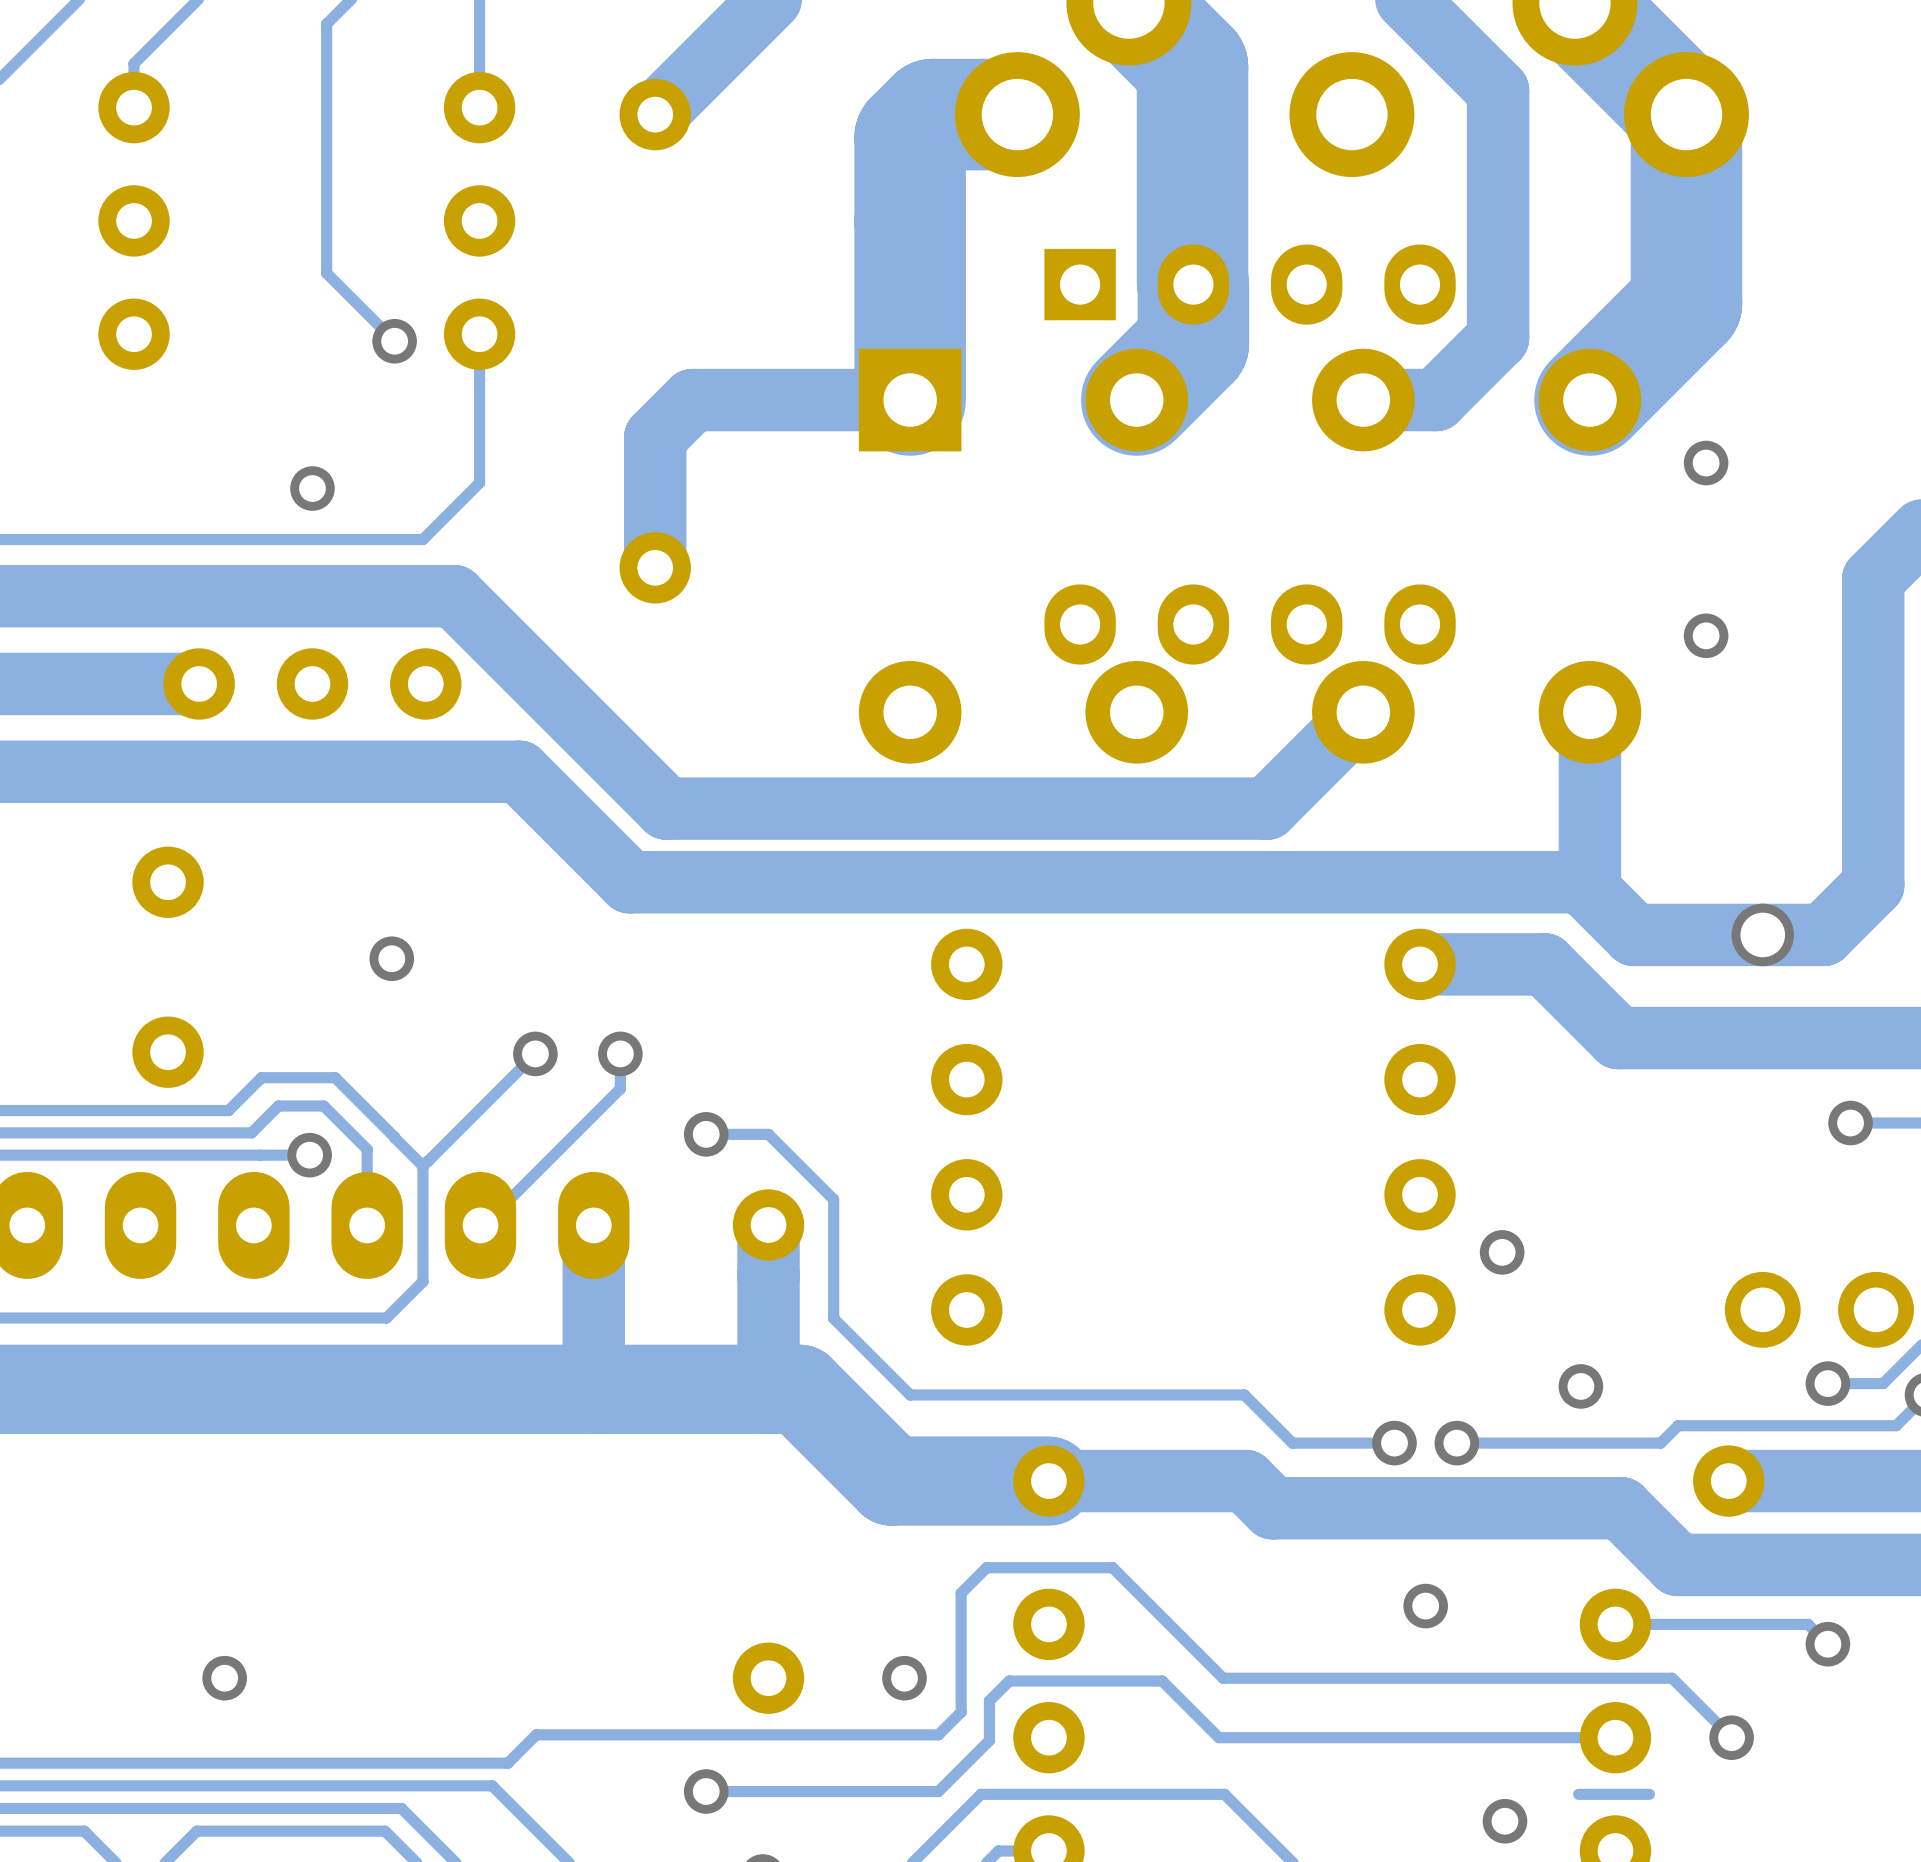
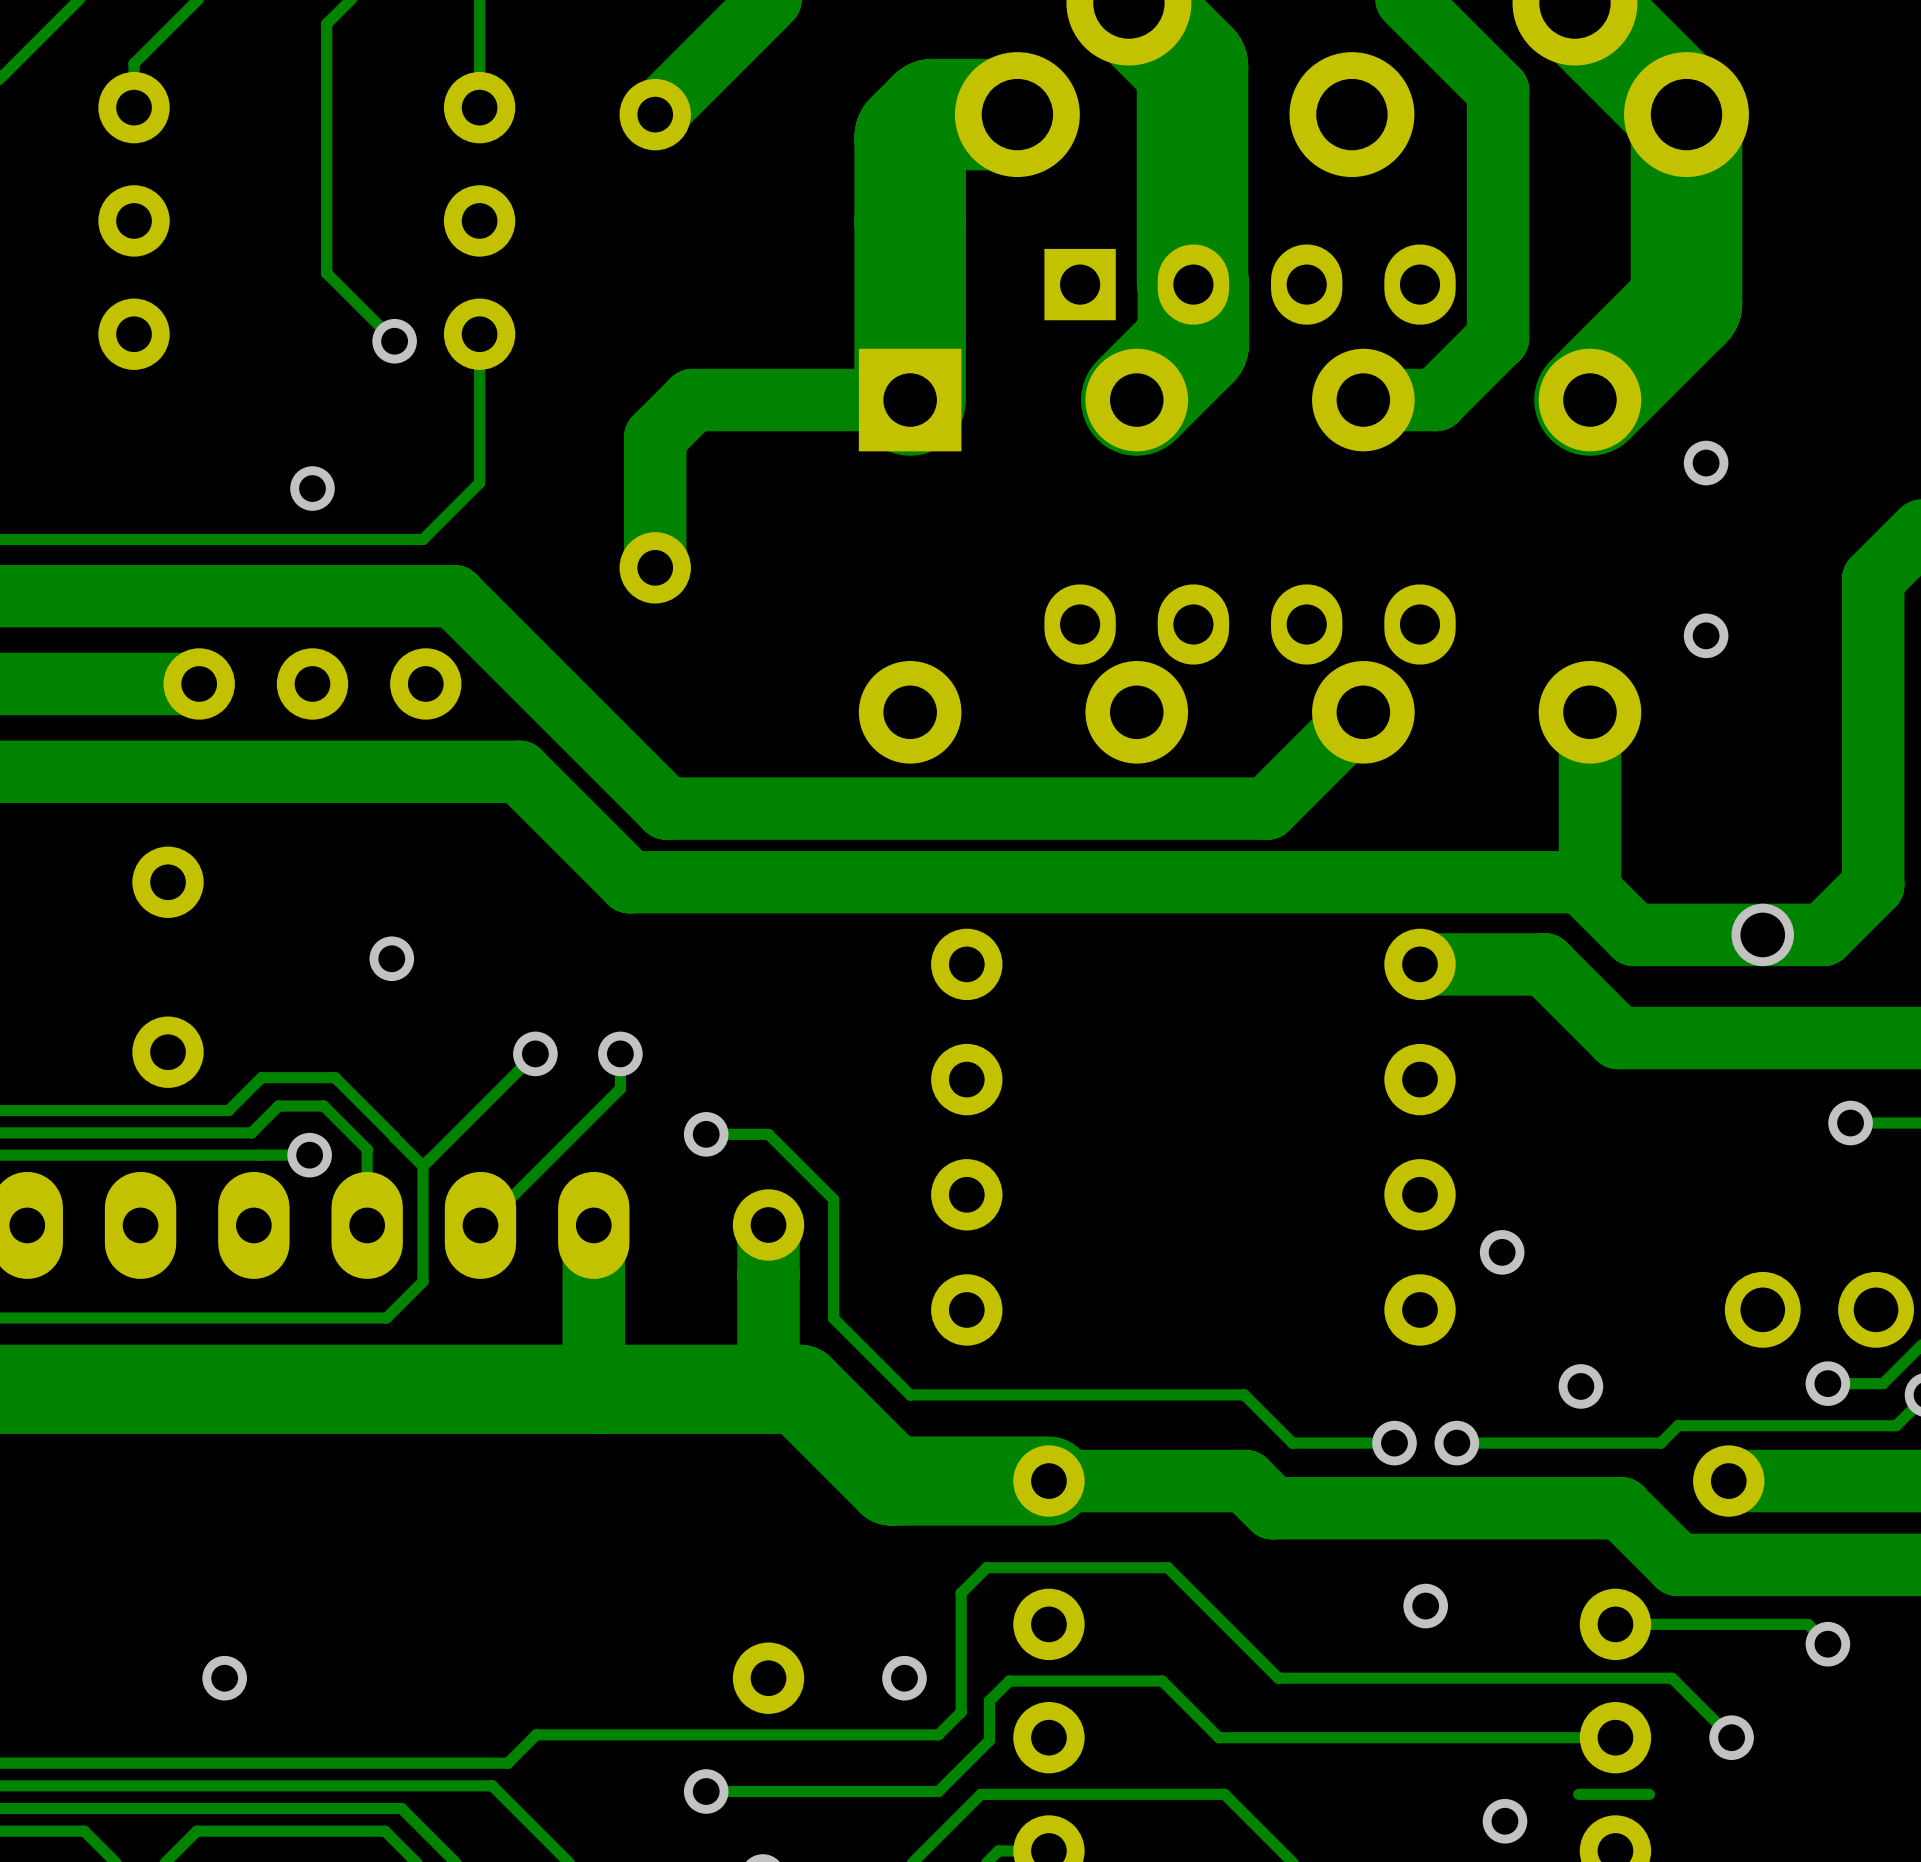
track: (1112, 1567) (1223, 1678) (1278, 1678) -> (1112, 1567) (1167, 1567) (1278, 1678)

